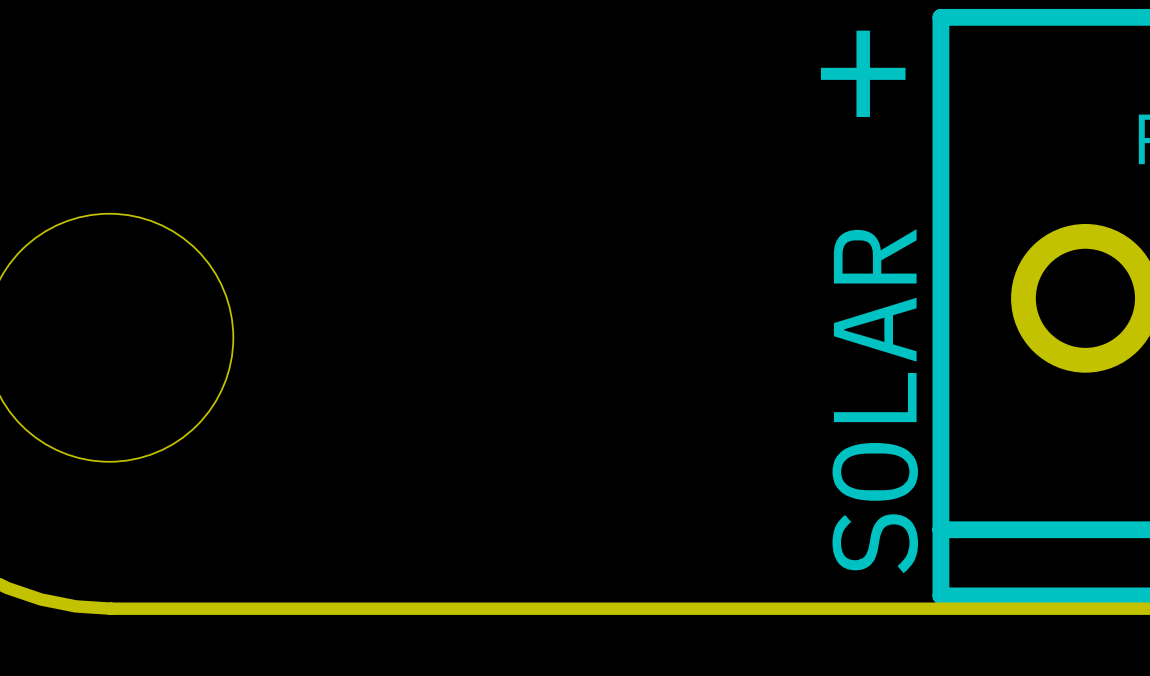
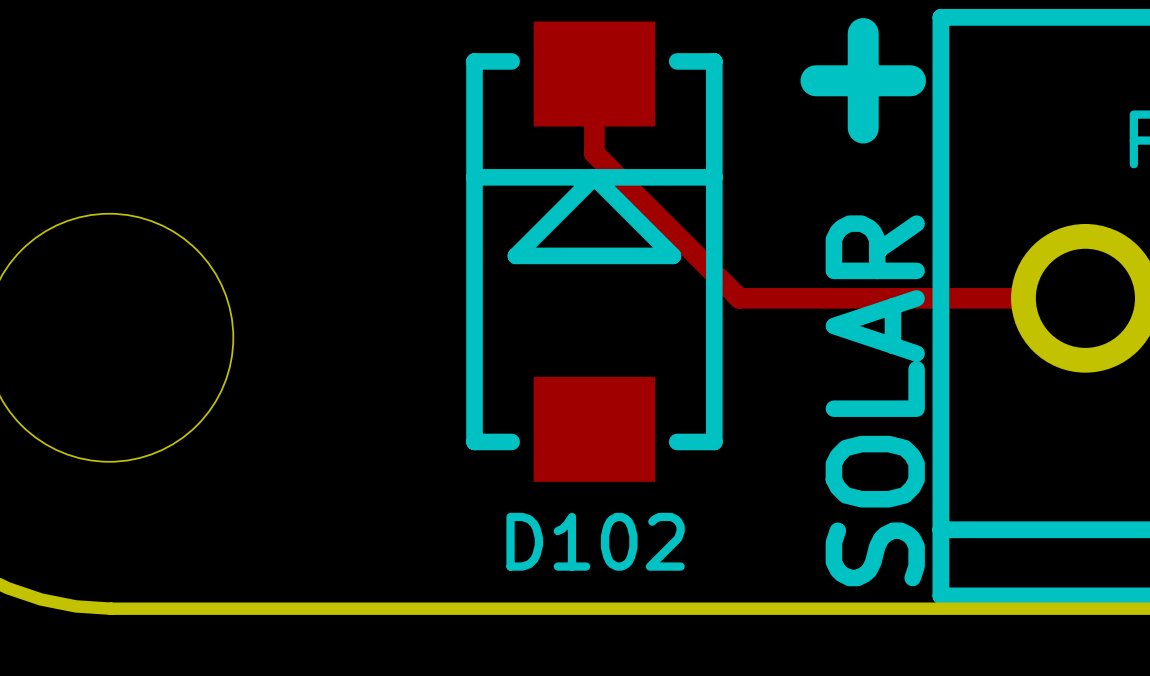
track: none -> (594, 74) (594, 153) (739, 298) (1085, 298)
D102: none -> (594, 251)

